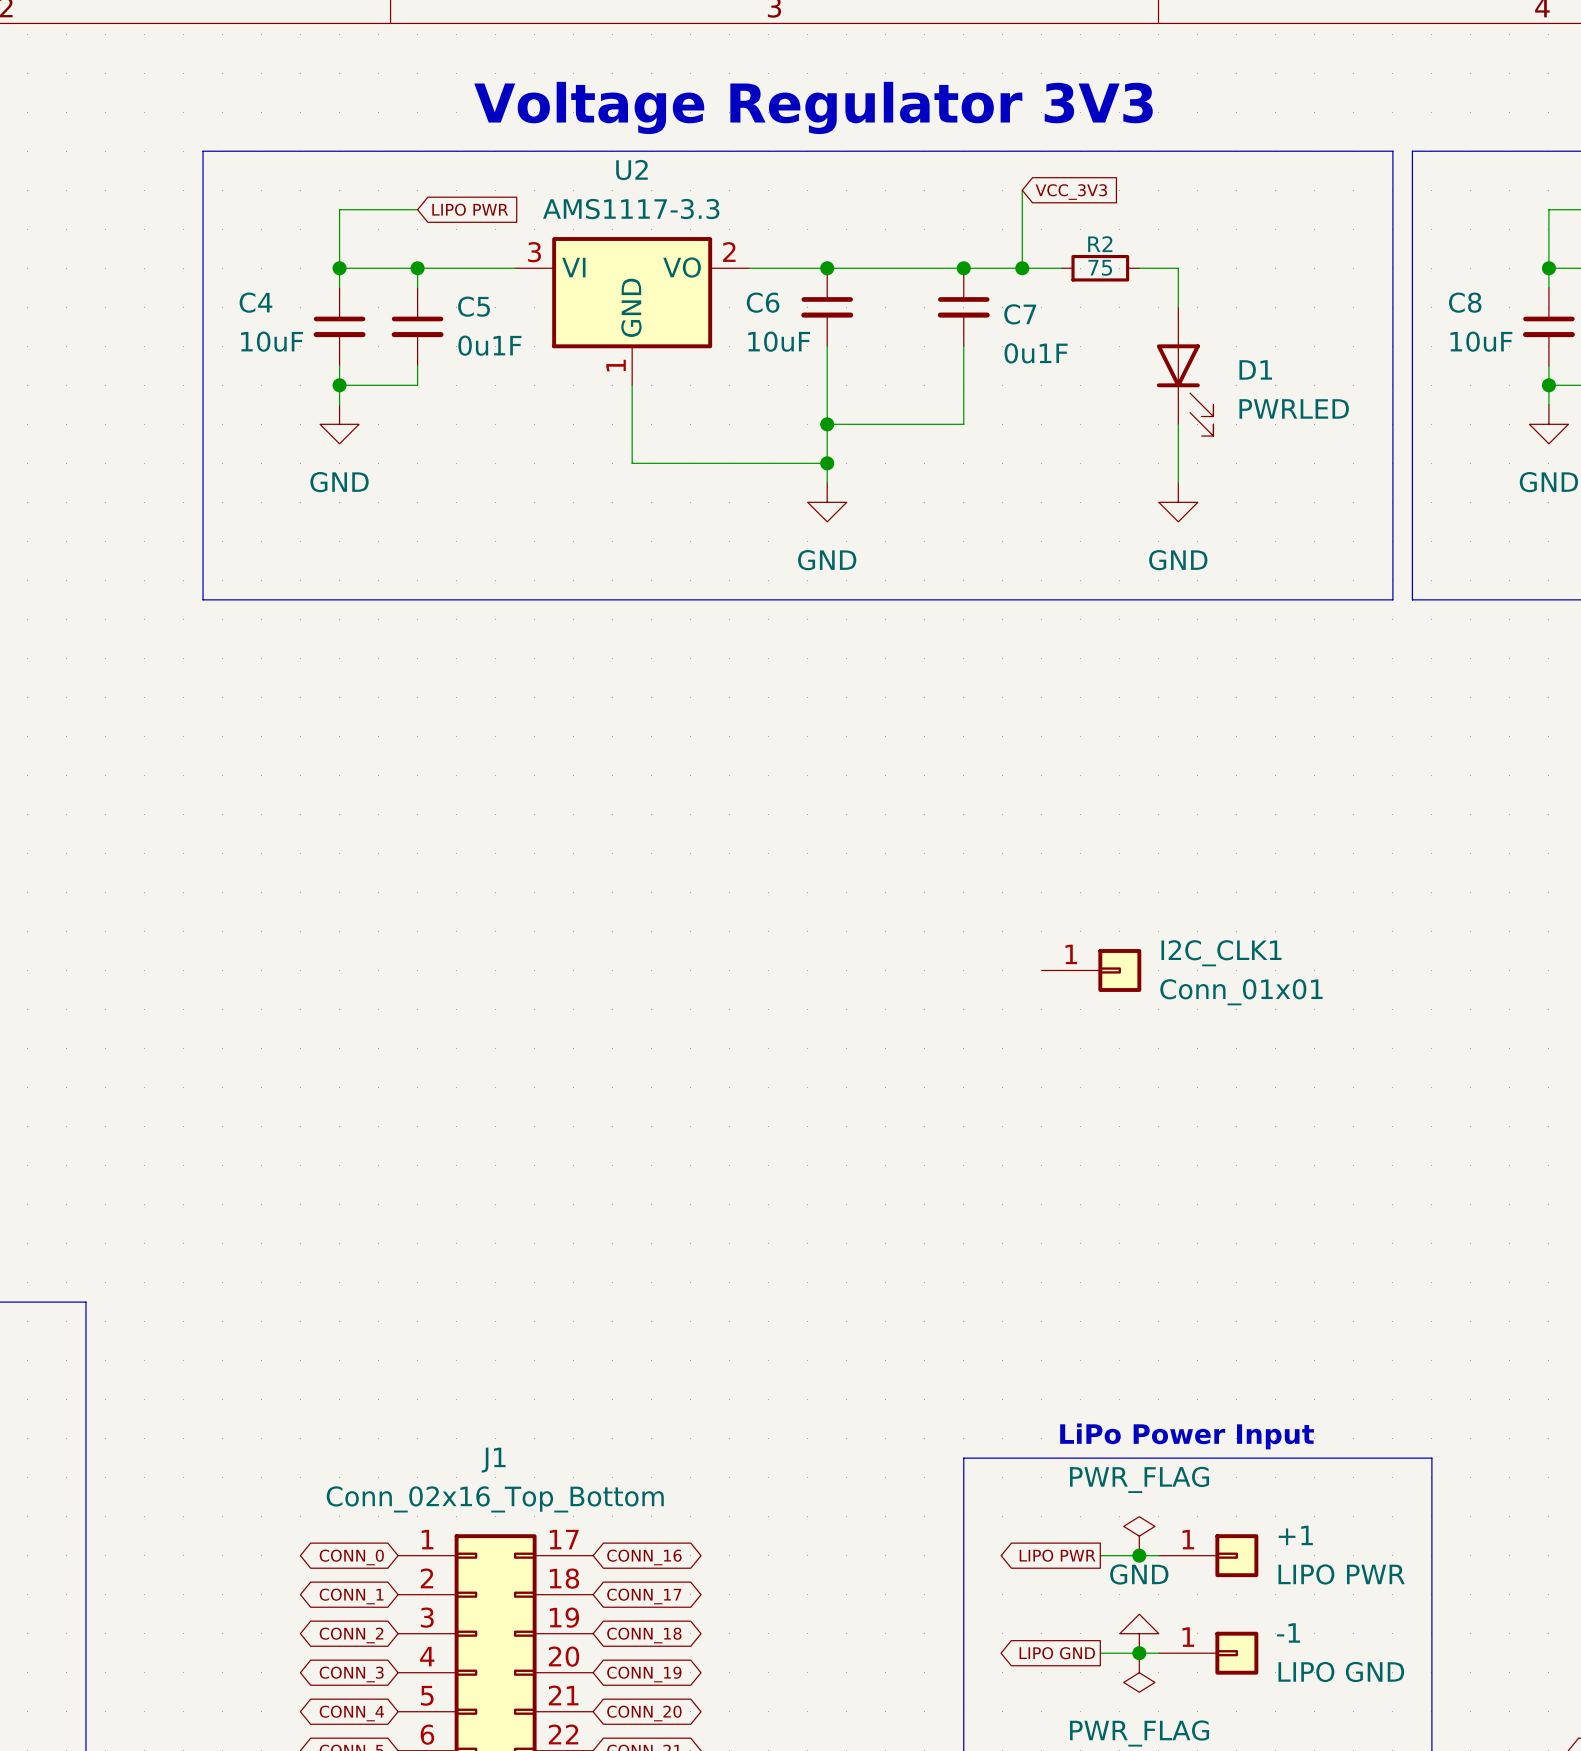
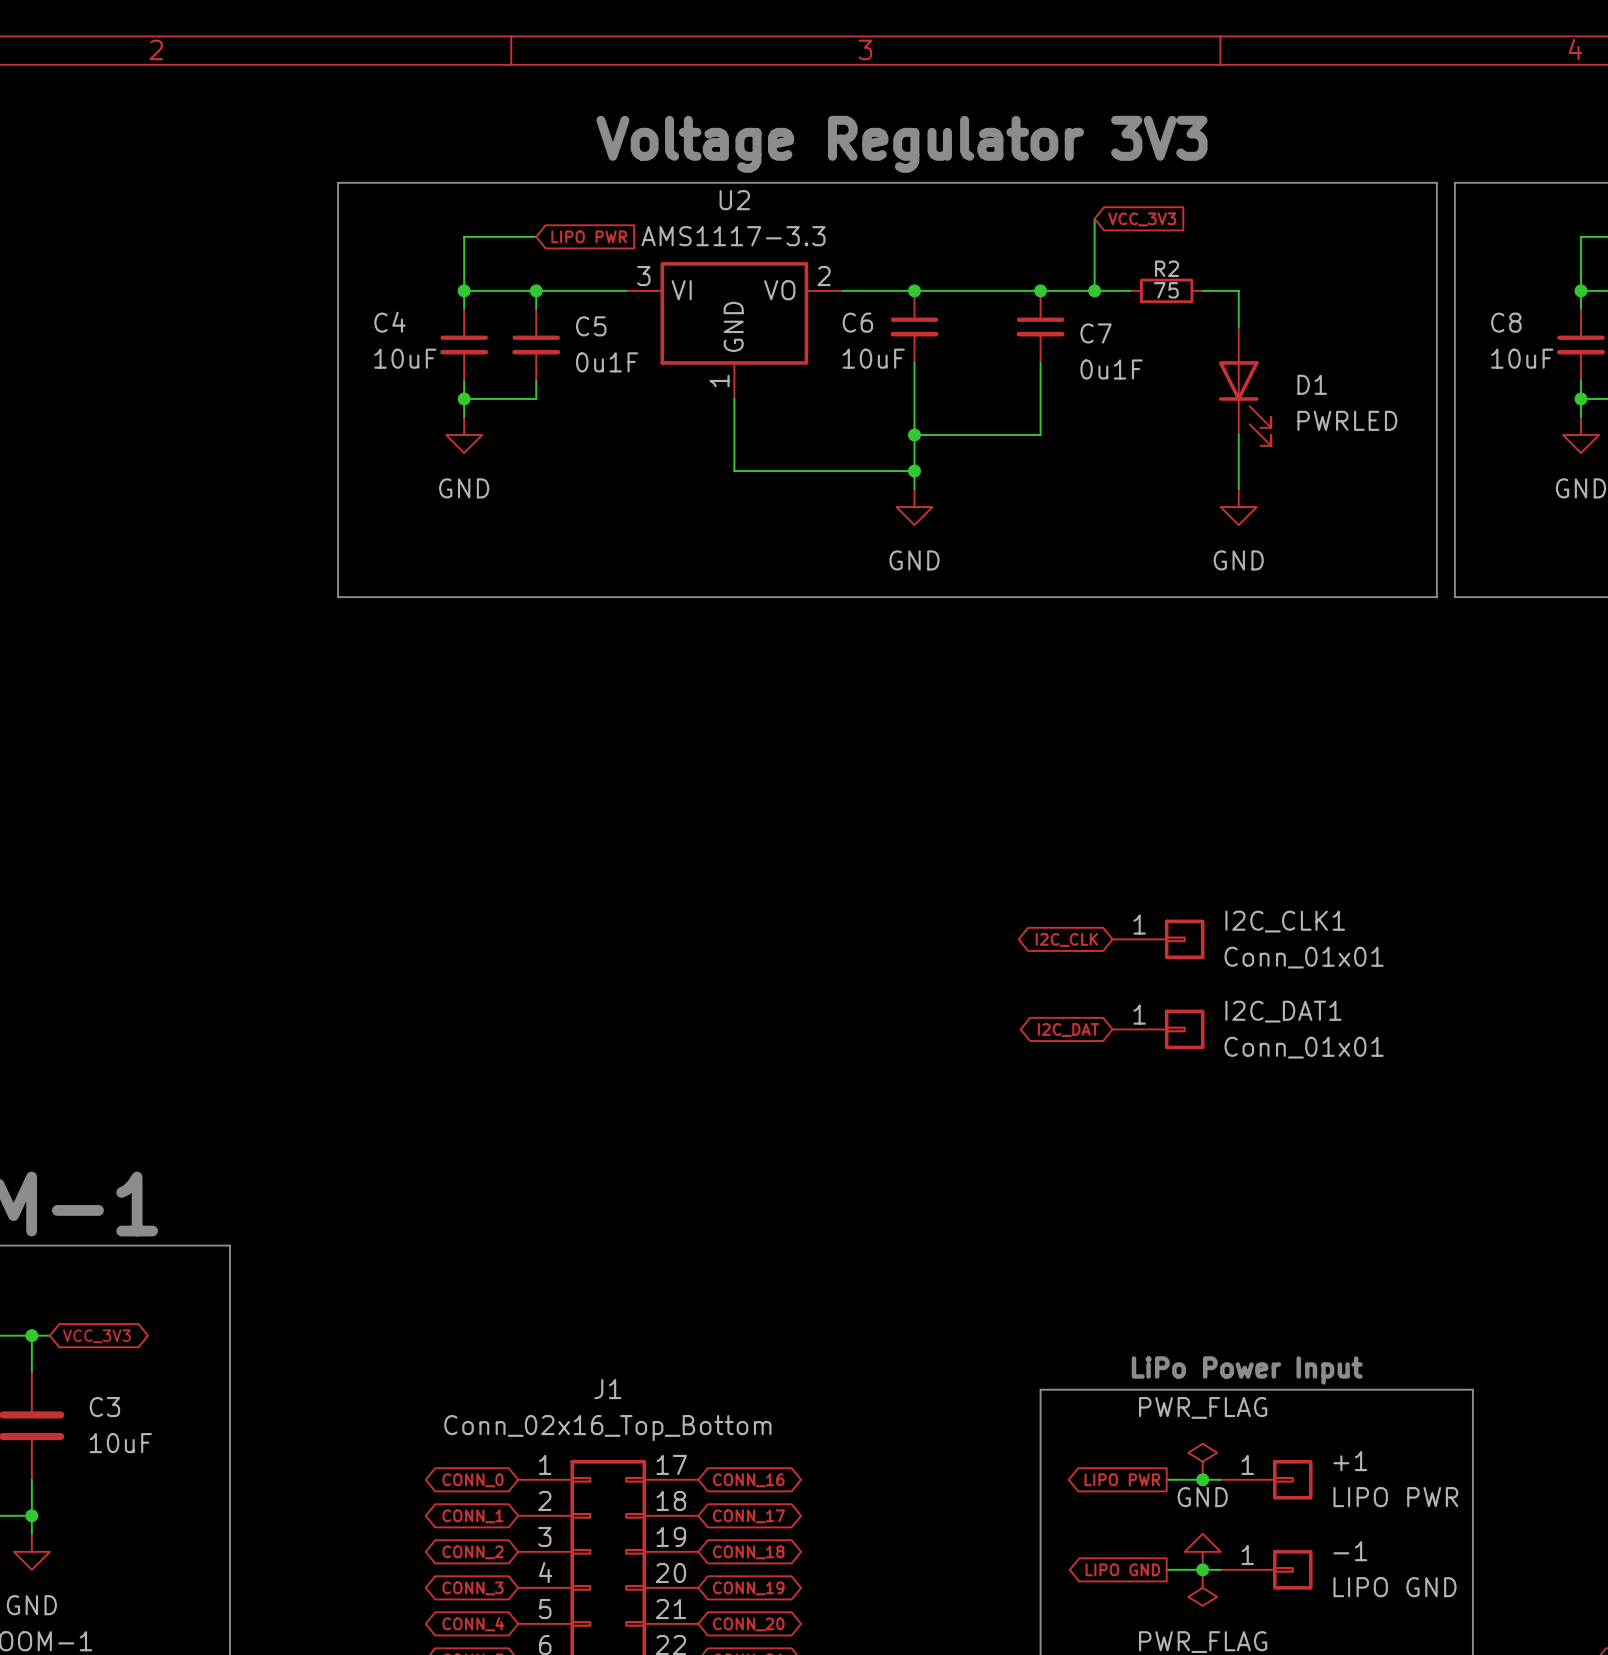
global label: none -> I2C_CLK (1066, 939)
I2C_DAT1: none -> Conn_01x01 (1158, 1029)
global label: none -> I2C_DAT (1068, 1029)

